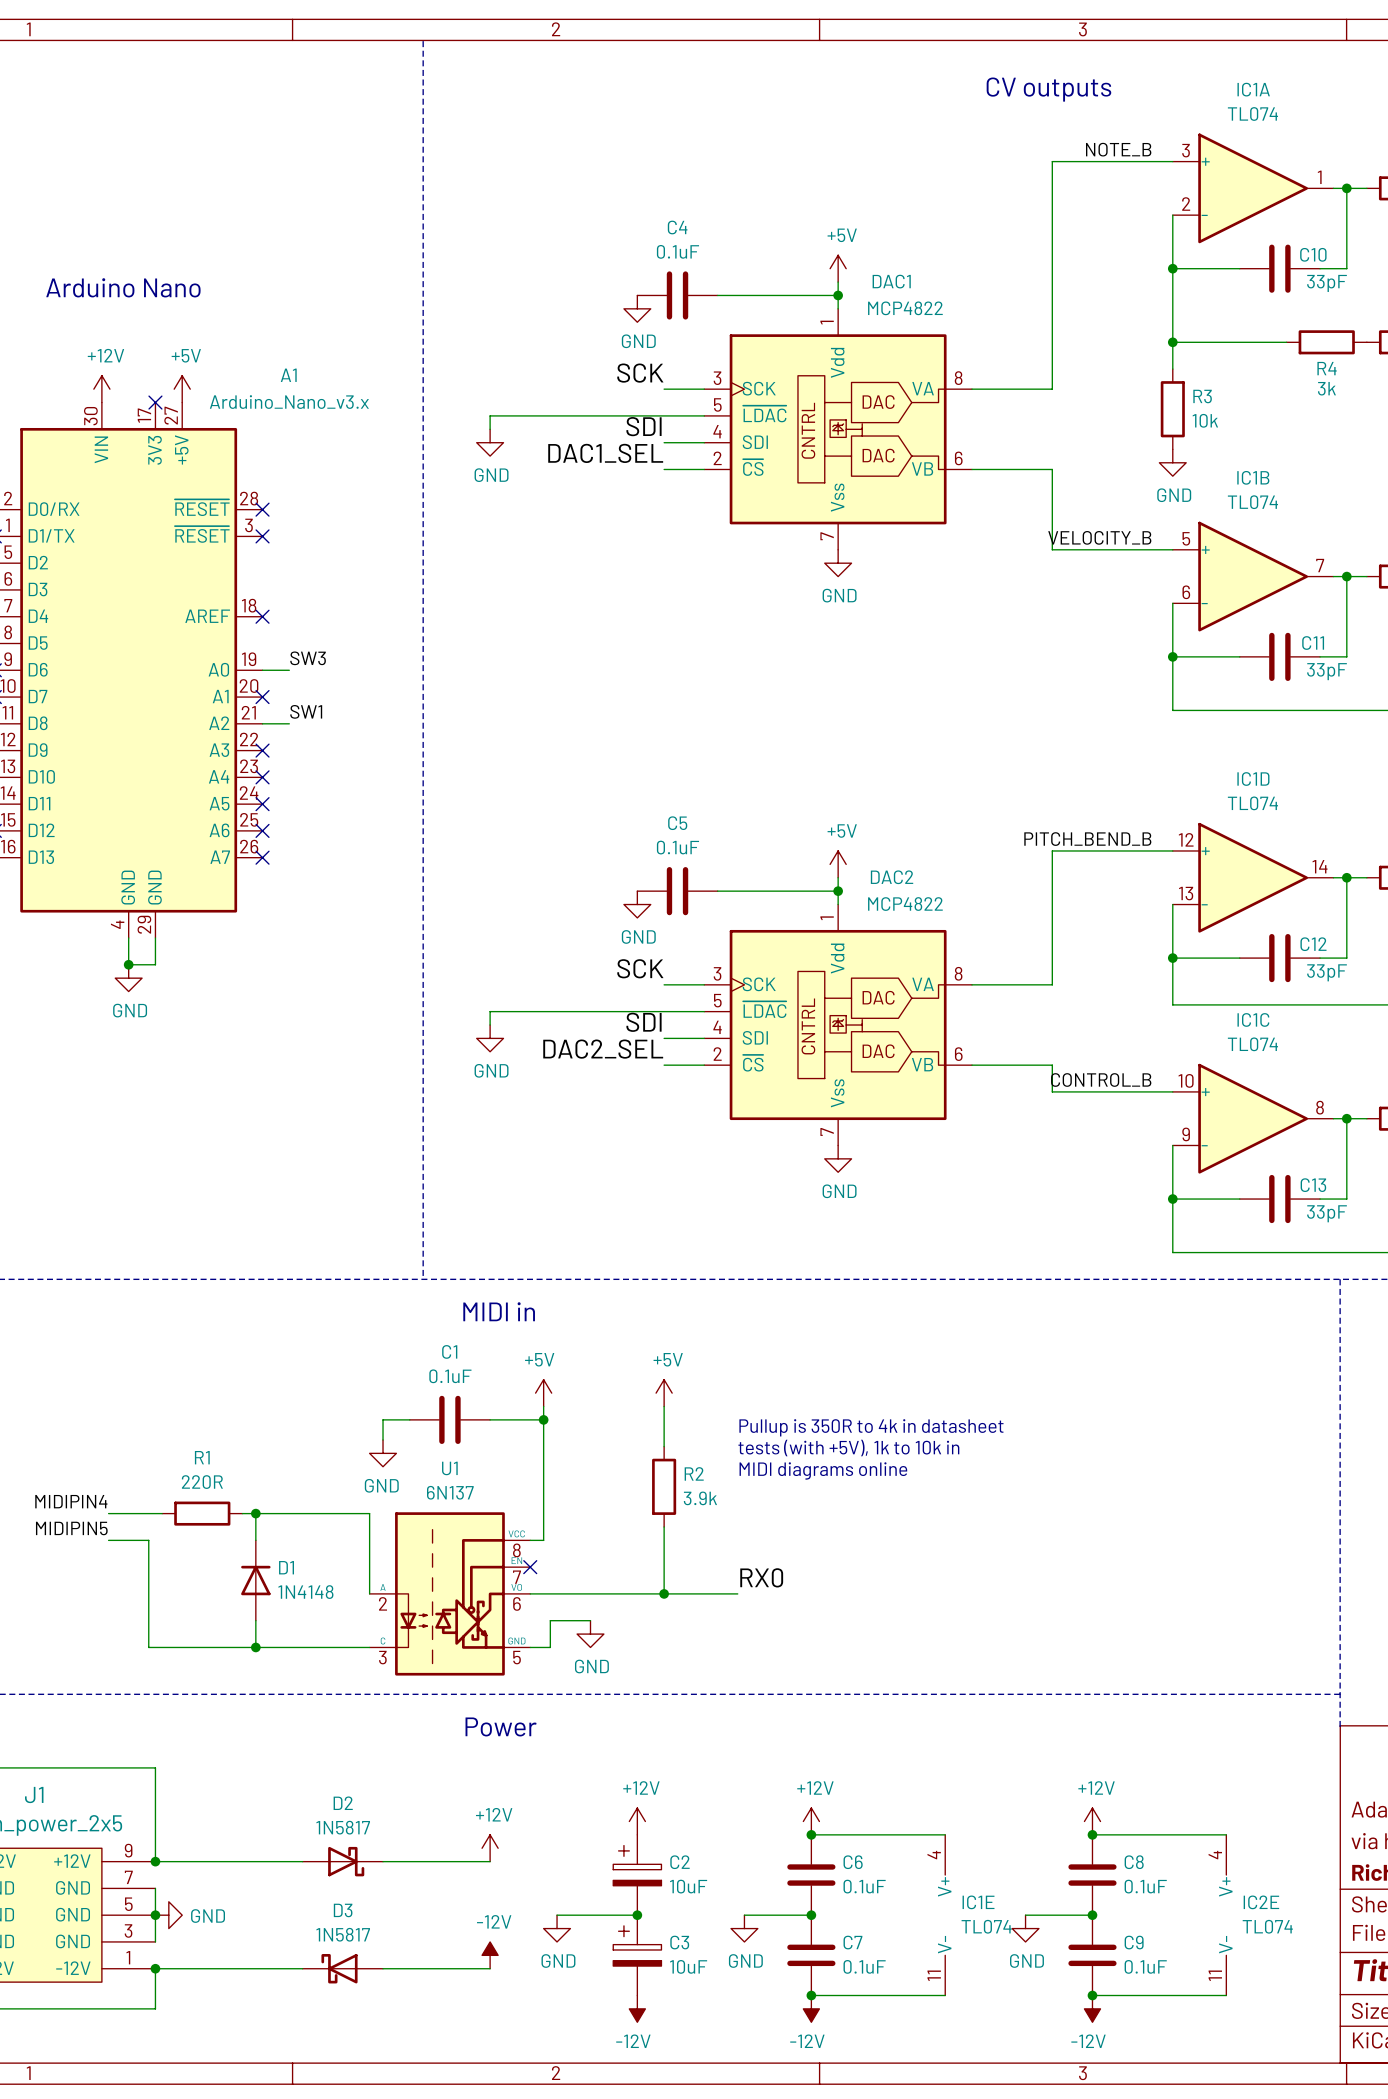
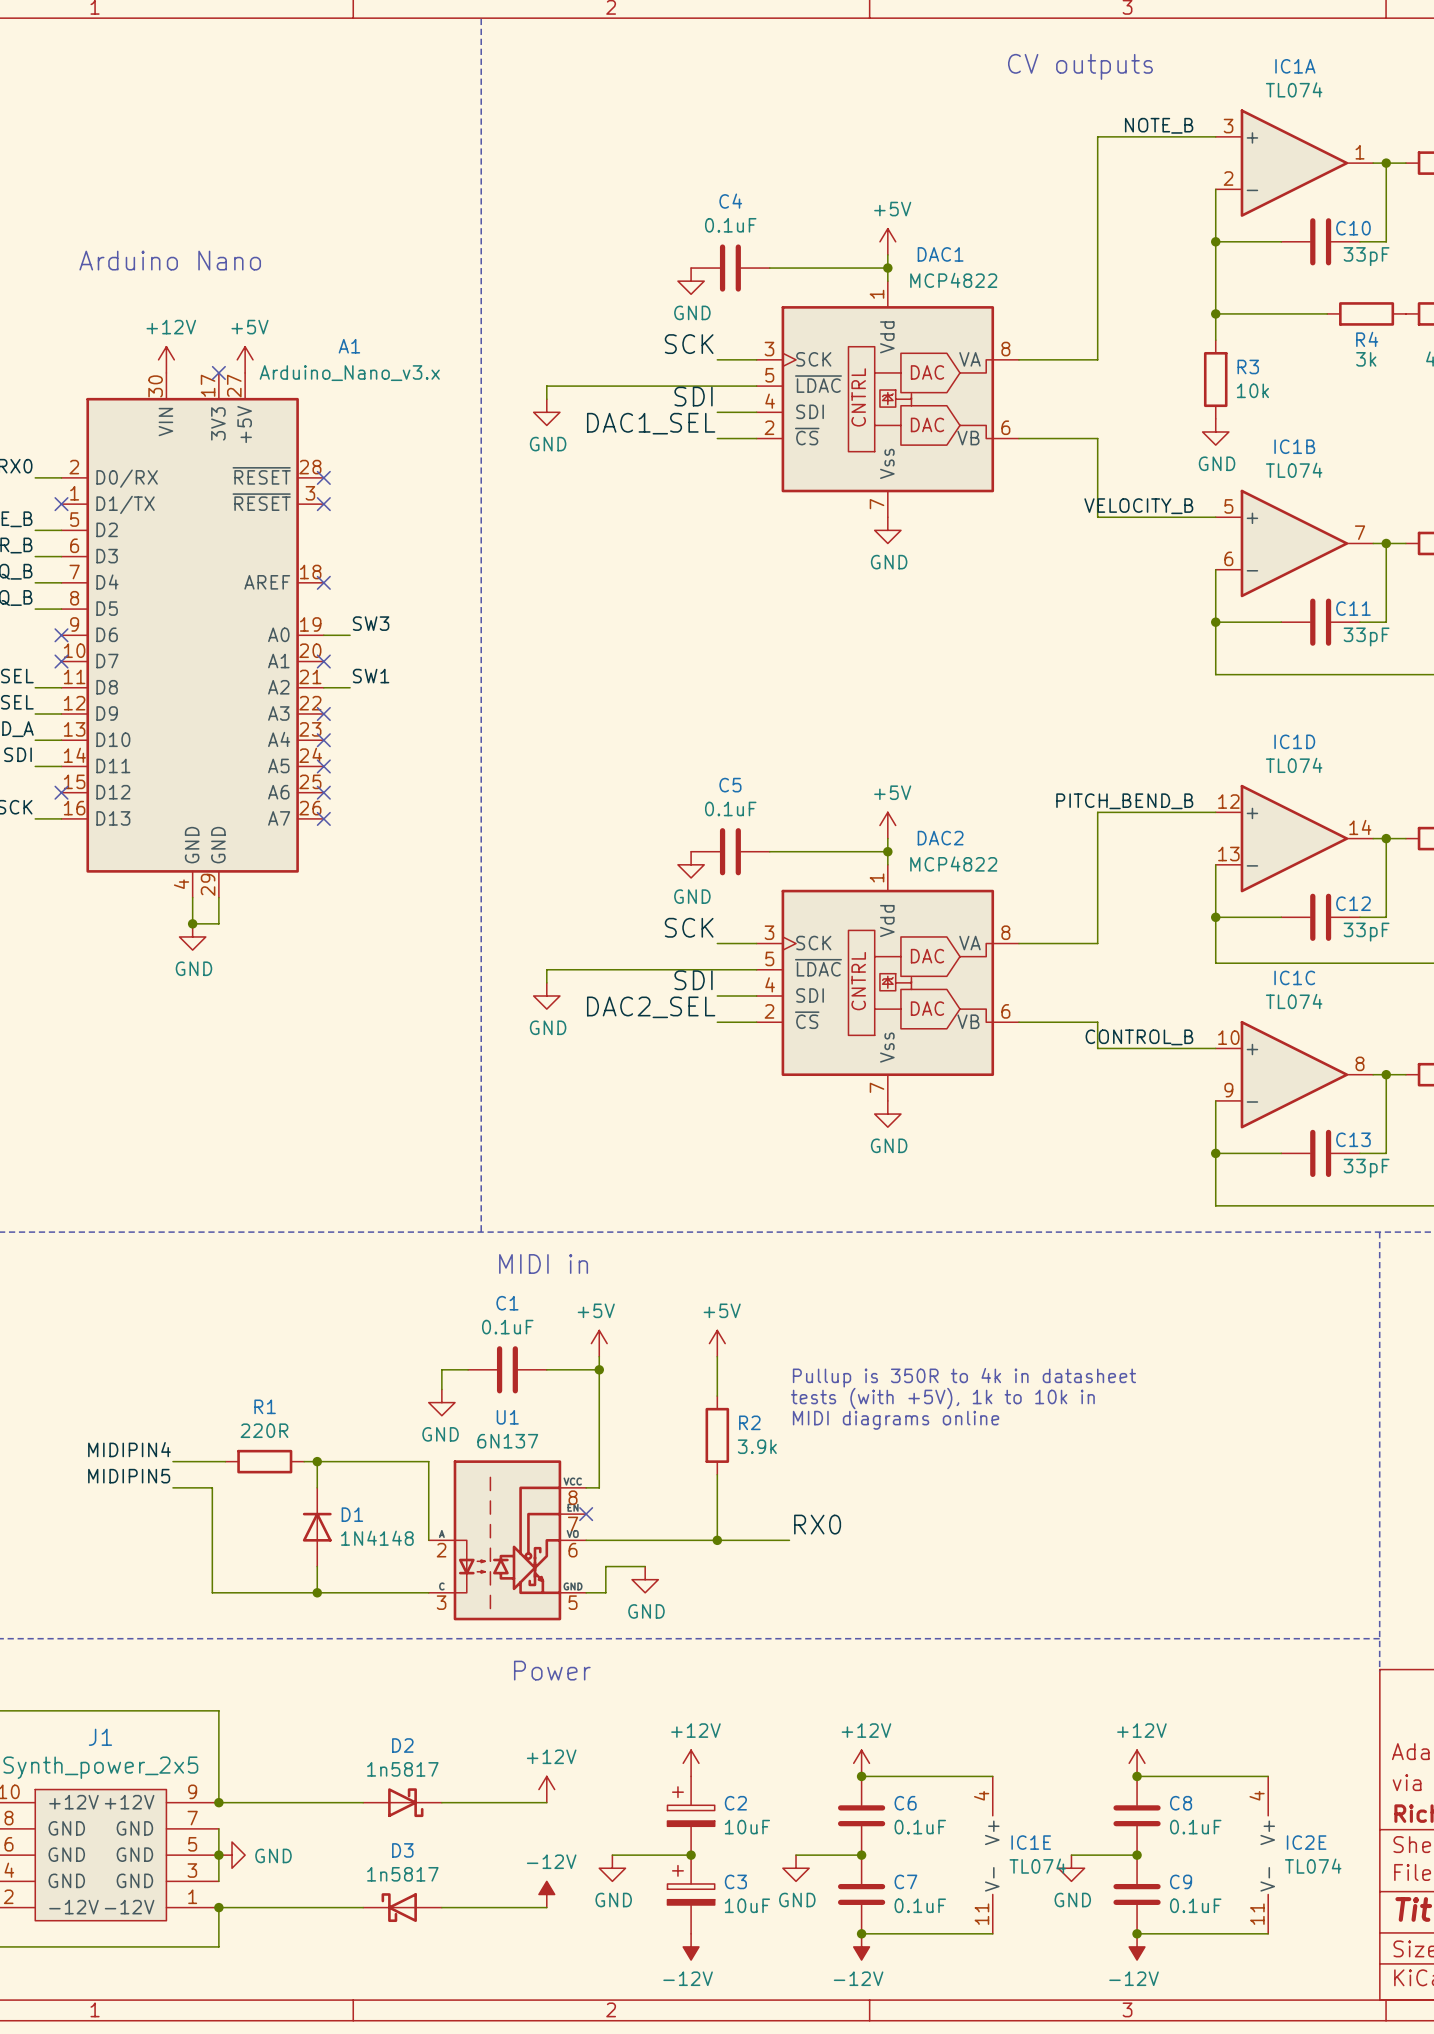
D2 value: 1N5817 (343, 1827) -> 1n5817 (402, 1769)
D3 value: 1N5817 (343, 1934) -> 1n5817 (402, 1874)

